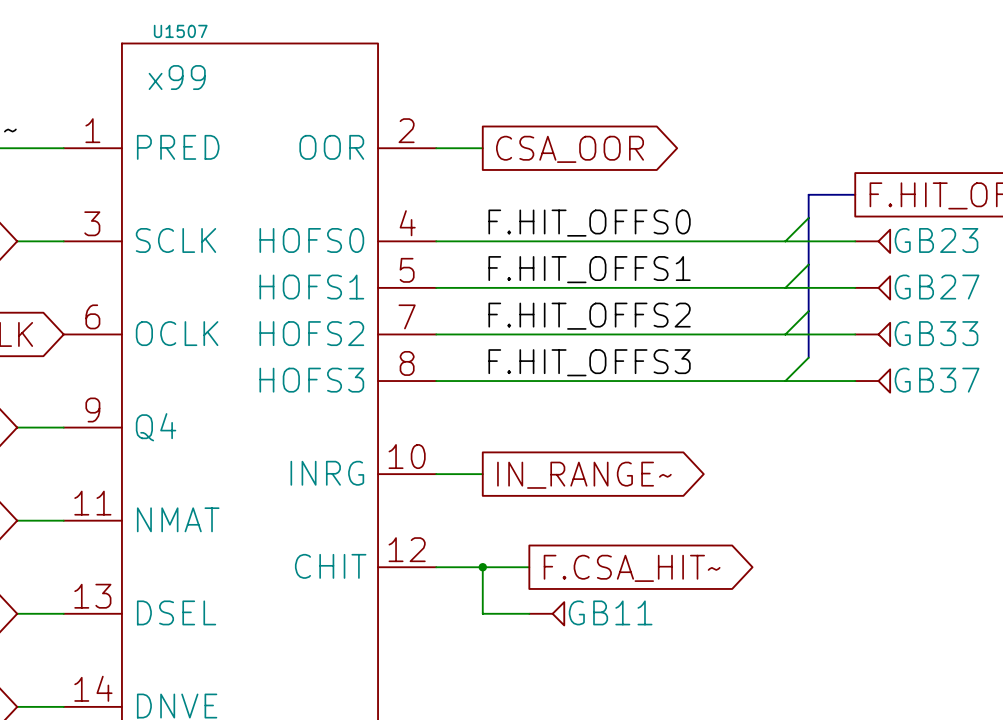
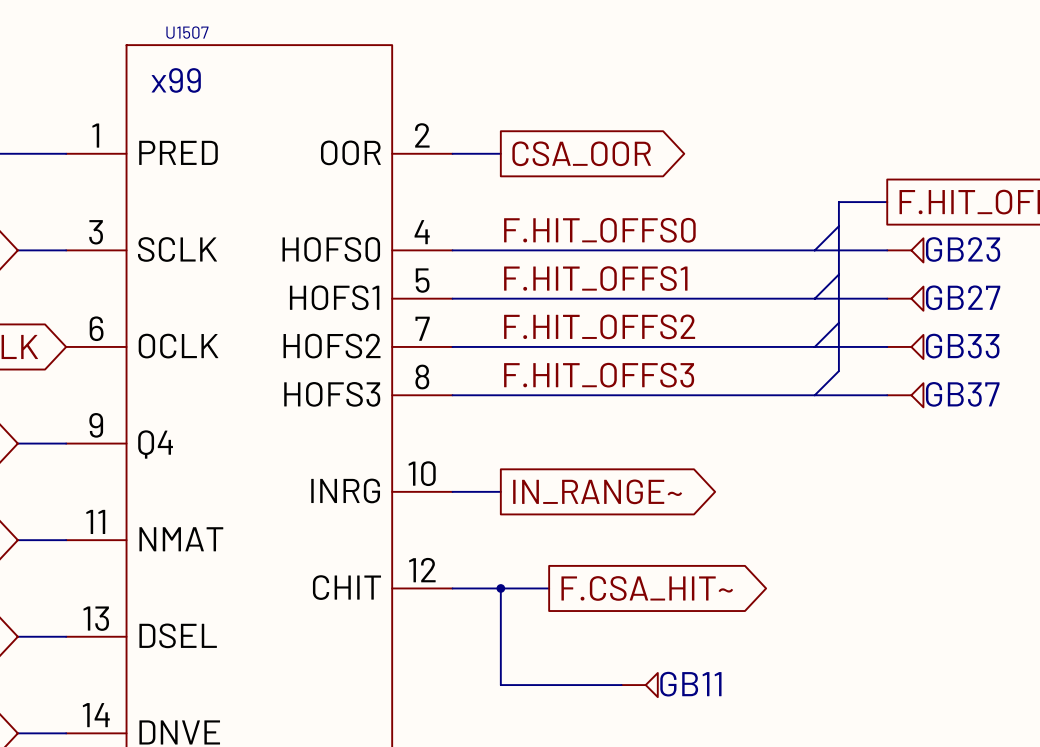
wire: (482, 613) (529, 613) -> (500, 636) (500, 685) (621, 685)
GB11 position: (547, 613) -> (640, 685)

